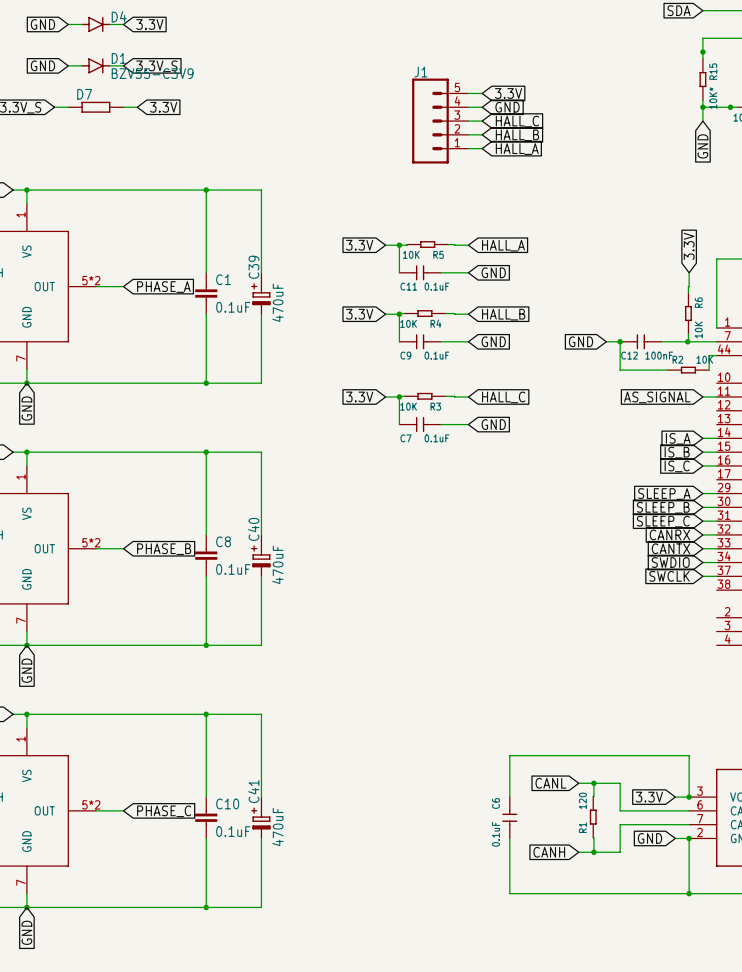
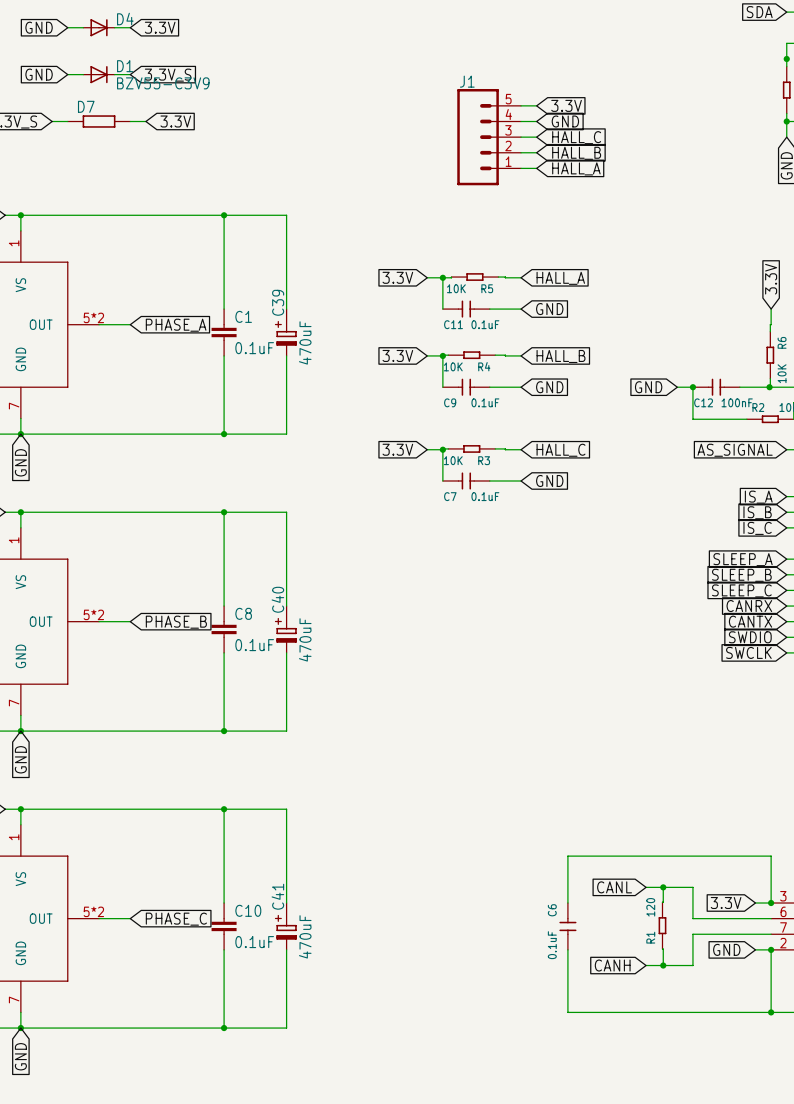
D4 symbol: [81, 16, 111, 33] -> [83, 19, 115, 37]
D1 symbol: [81, 58, 111, 74] -> [83, 66, 115, 84]

